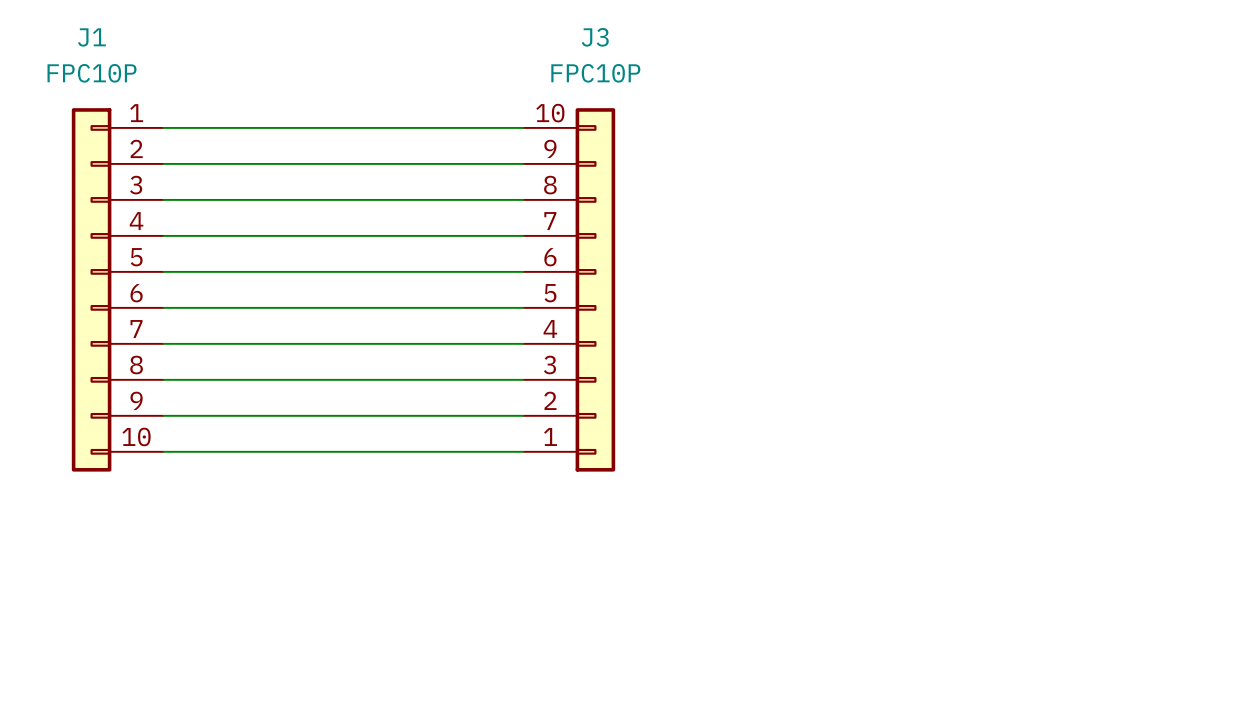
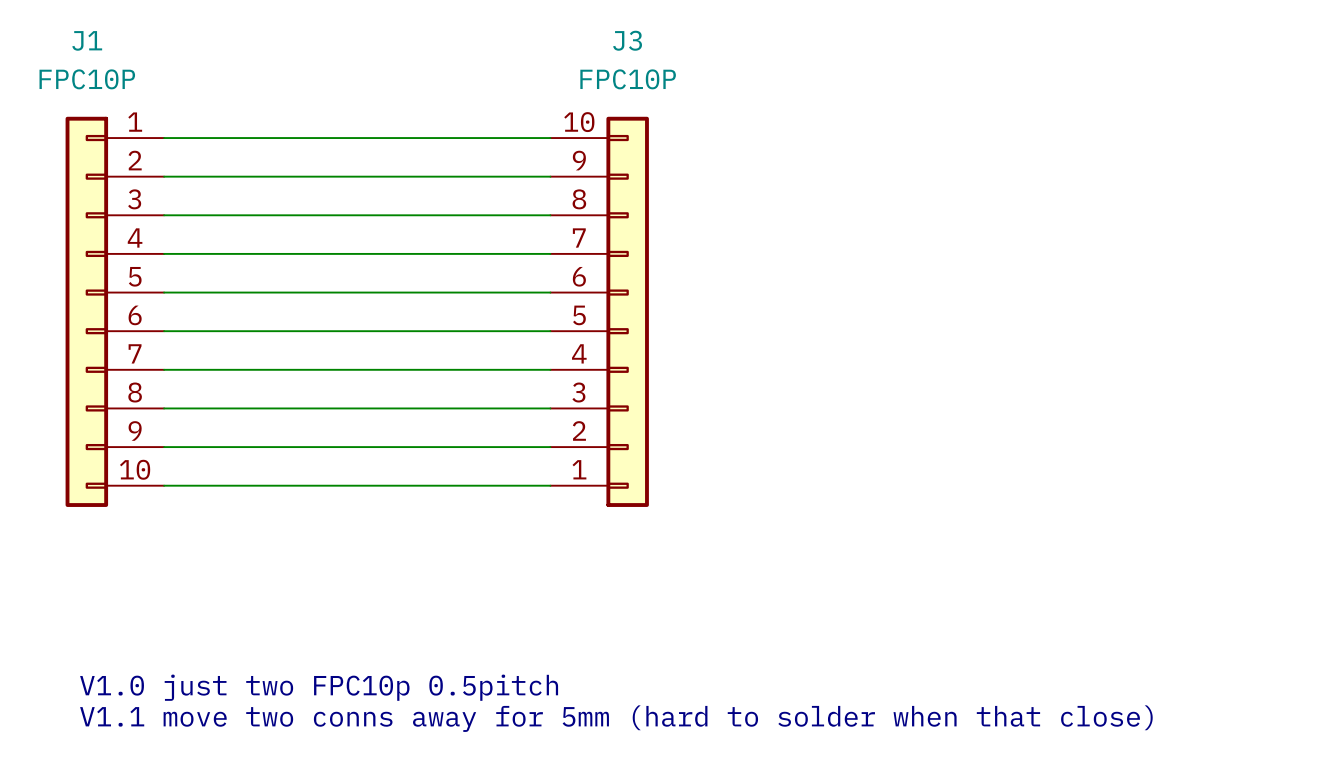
text: none -> V1.0 just two FPC10p 0.5pitch (319, 687)
text: none -> V1.1 move two conns away for 5mm (hard to solder when that close) (616, 718)

